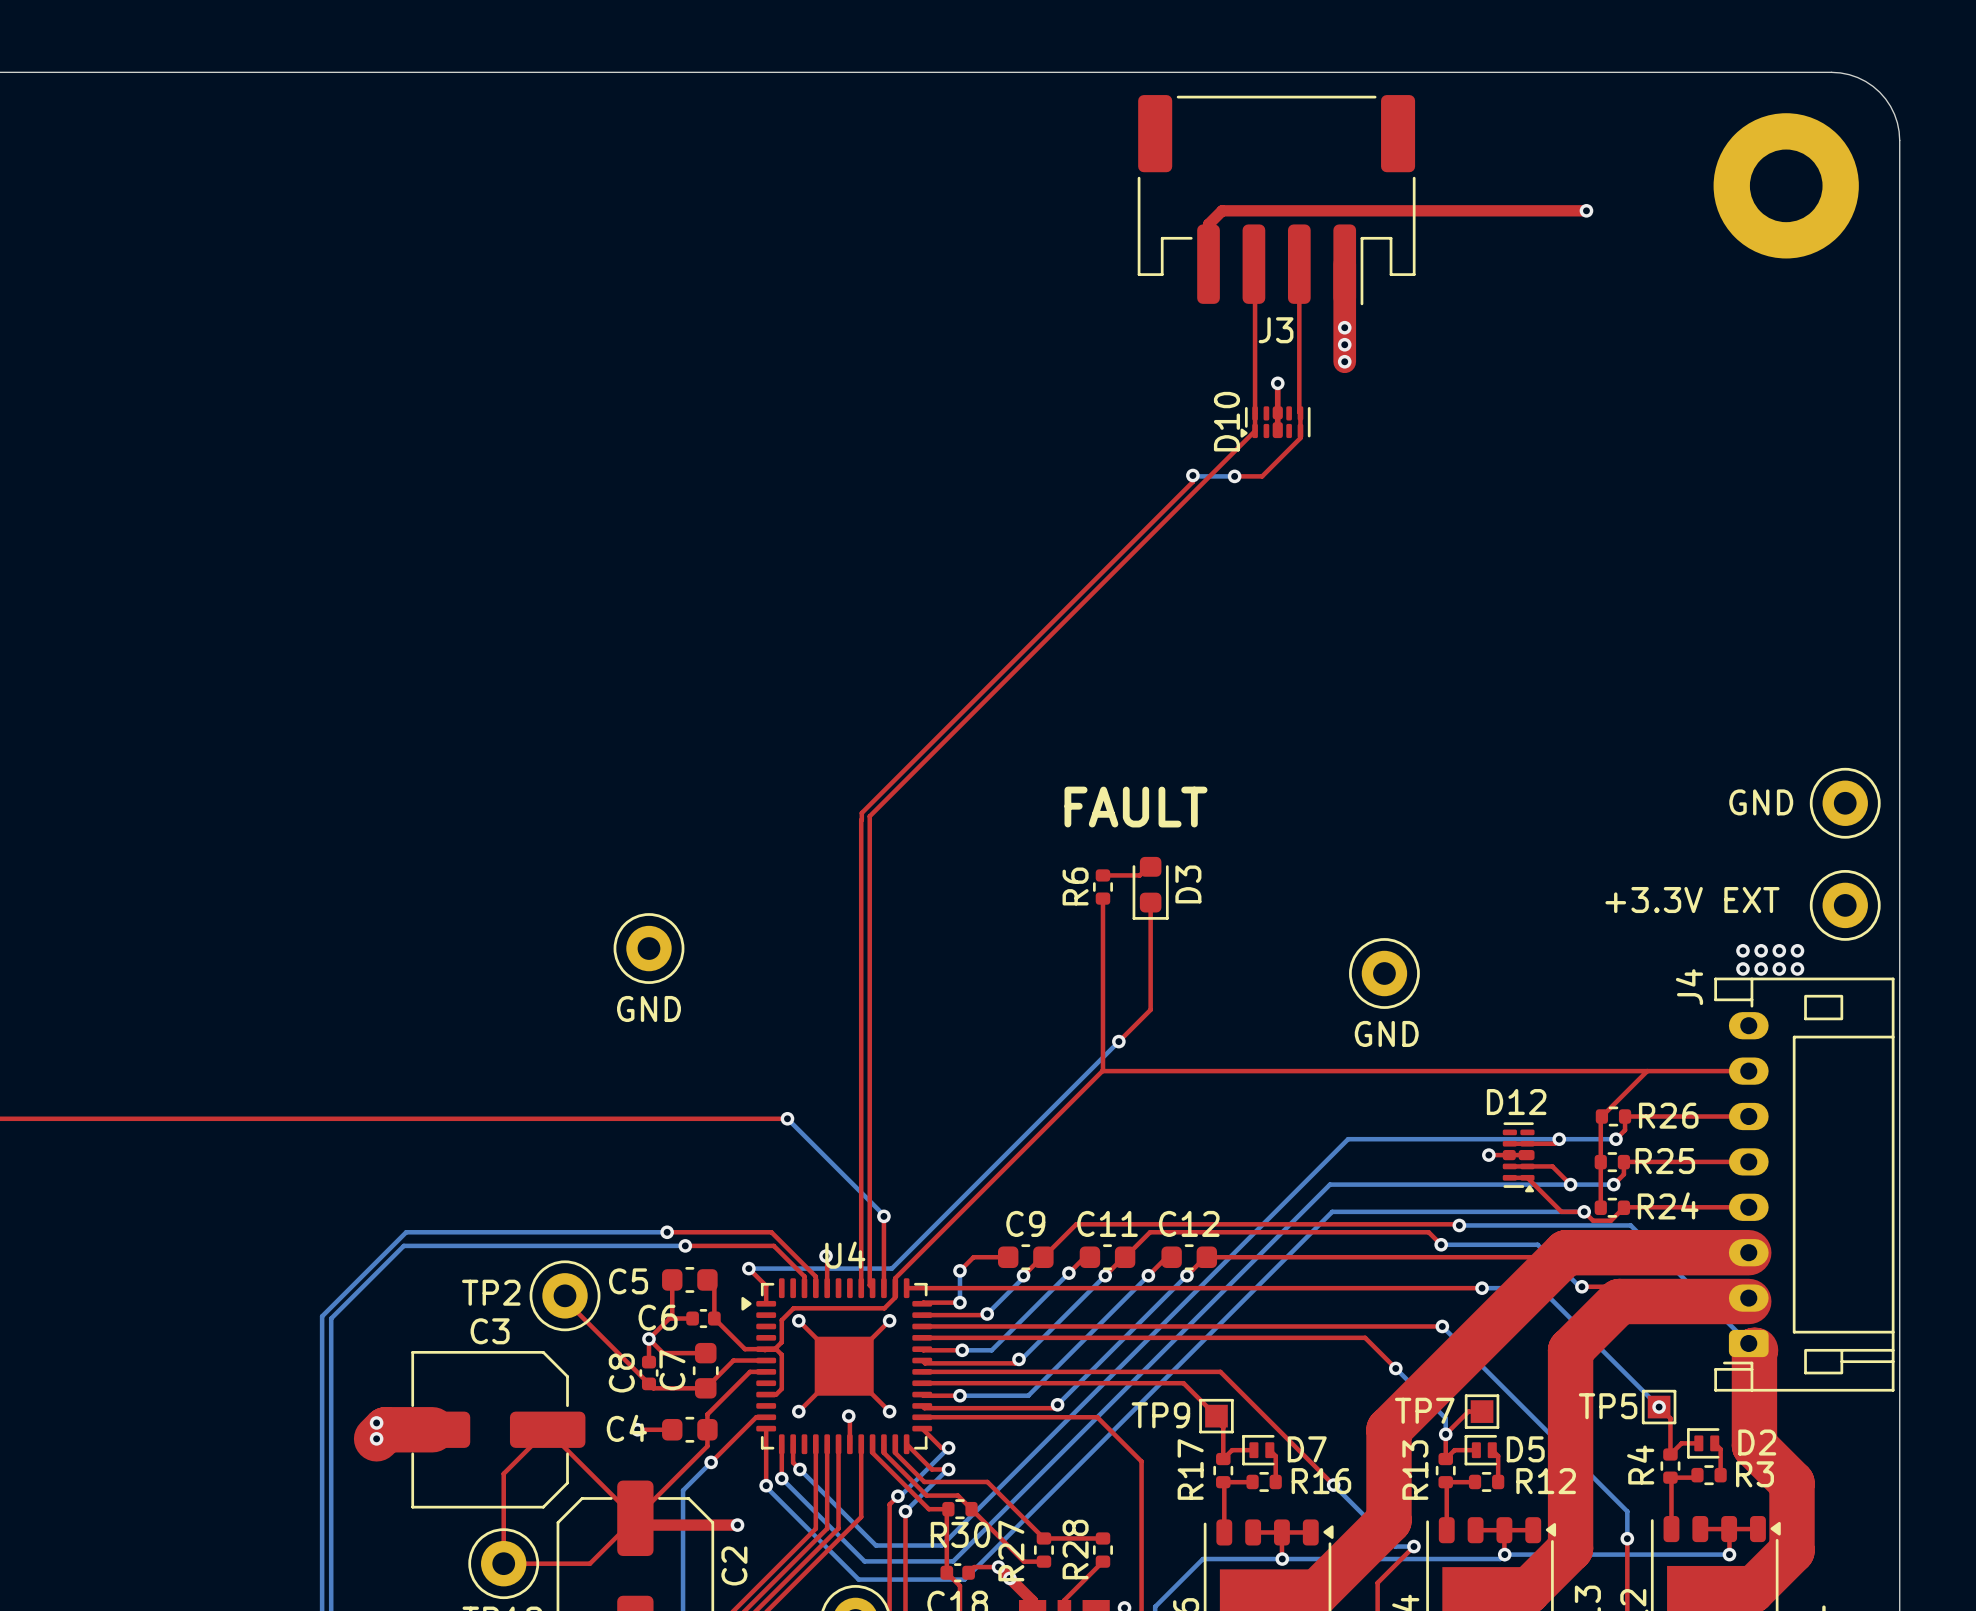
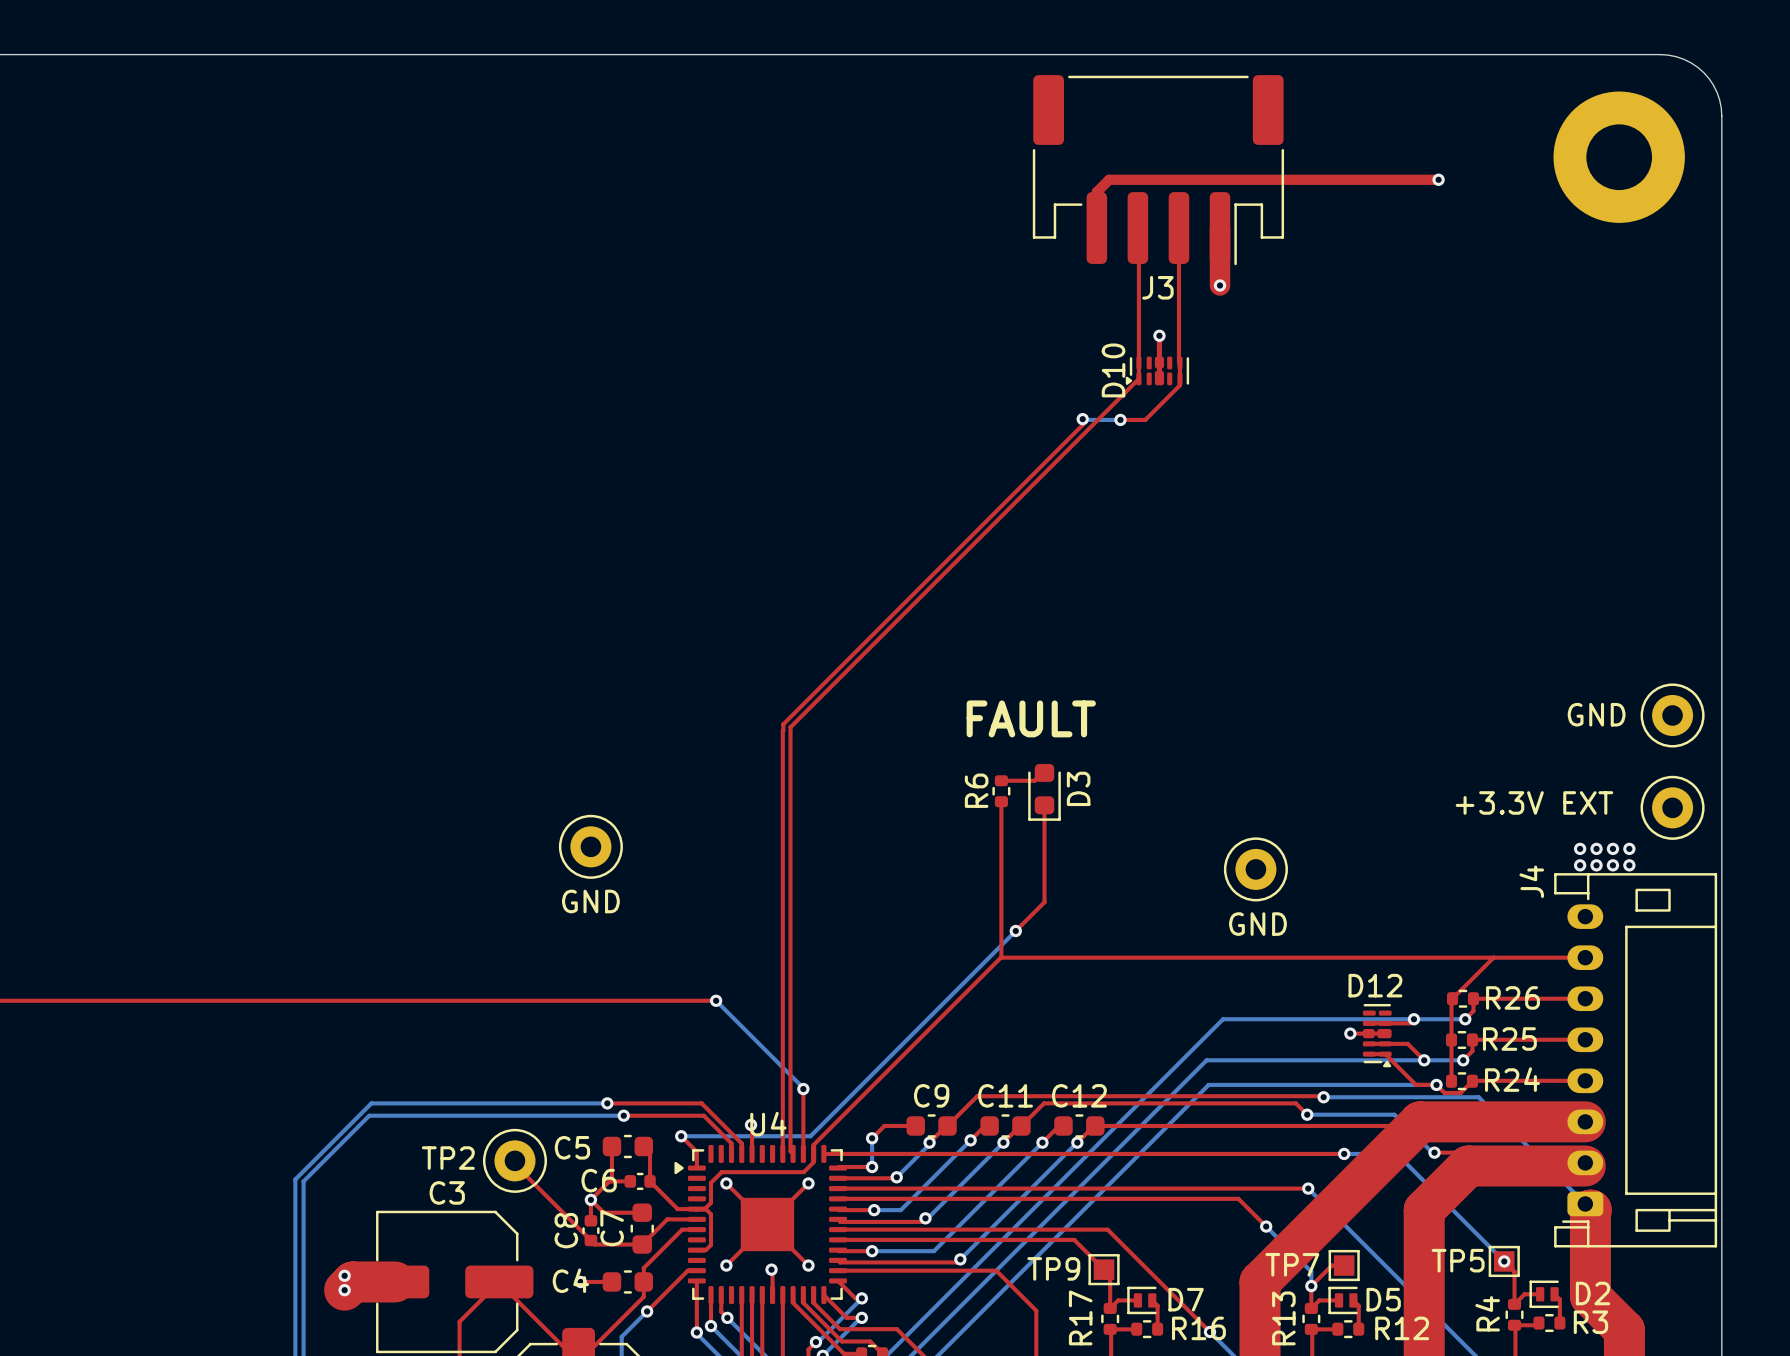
top track: (1344, 327) (1344, 361) -> none
via: (1344, 344) -> none
via: (1344, 361) -> none

